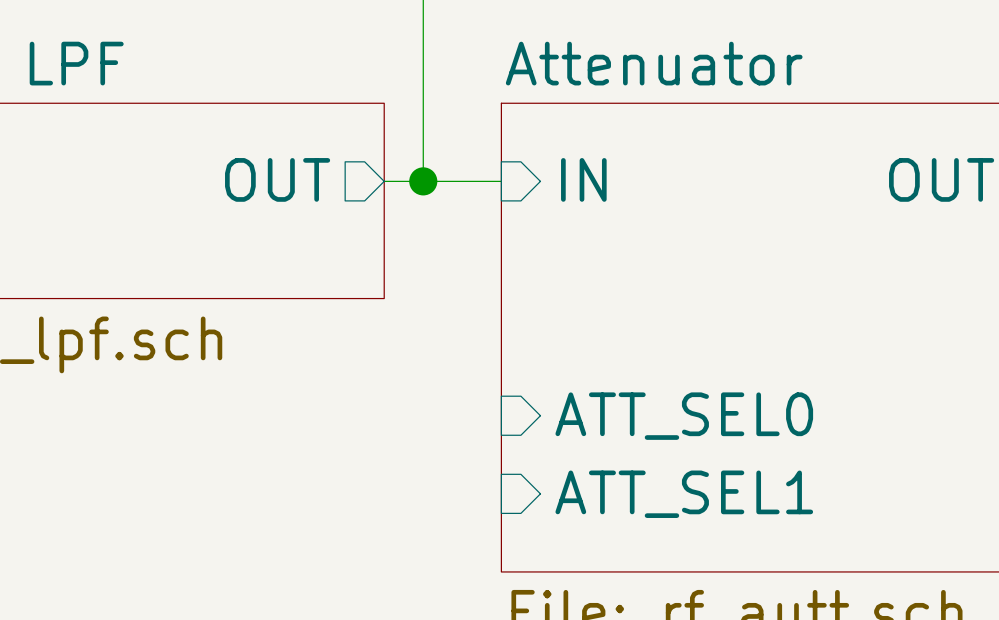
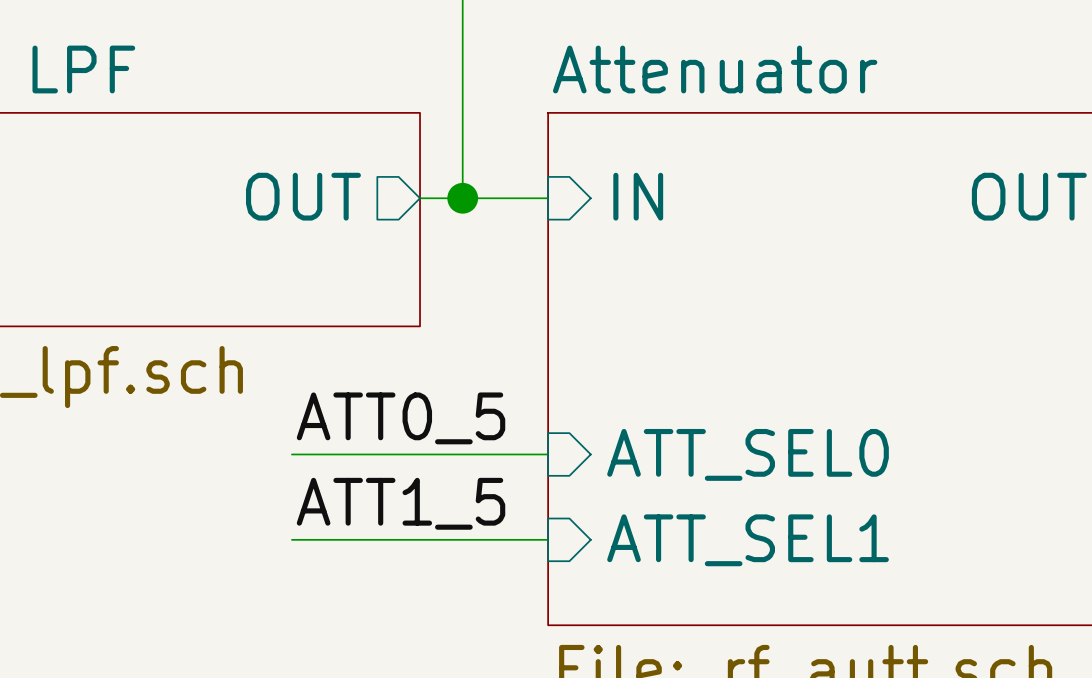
label: none -> ATT0_5 (401, 418)
wire: none -> (291, 454) (548, 454)
label: none -> ATT1_5 (401, 503)
wire: none -> (291, 539) (548, 539)

